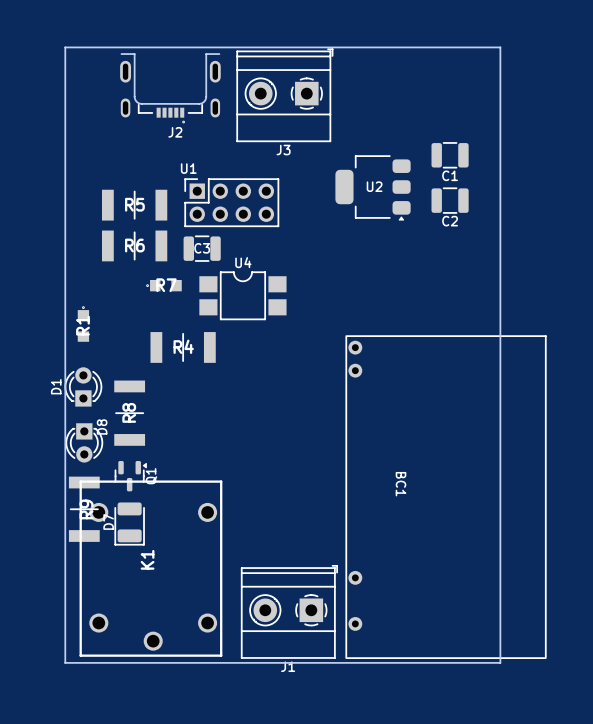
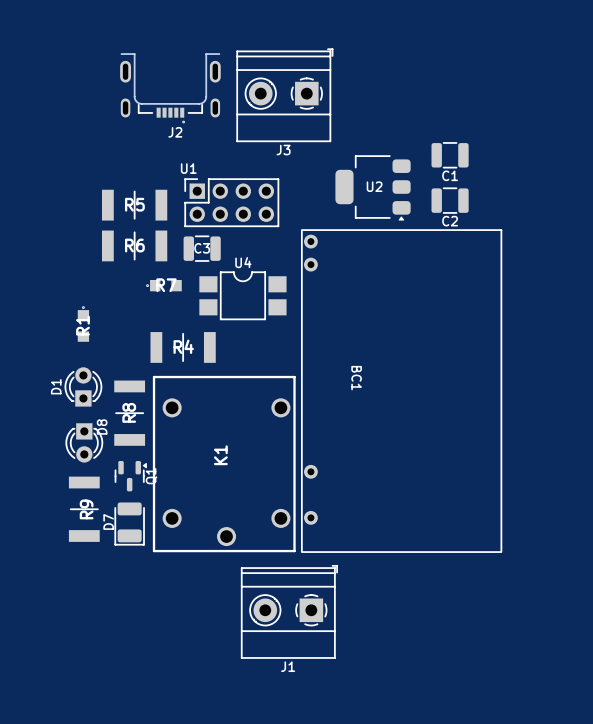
board edge: (65, 47) (500, 47) (500, 662) (65, 662) (65, 47) -> none
BC1 position: (446, 497) -> (401, 391)
K1 position: (150, 568) -> (224, 464)

